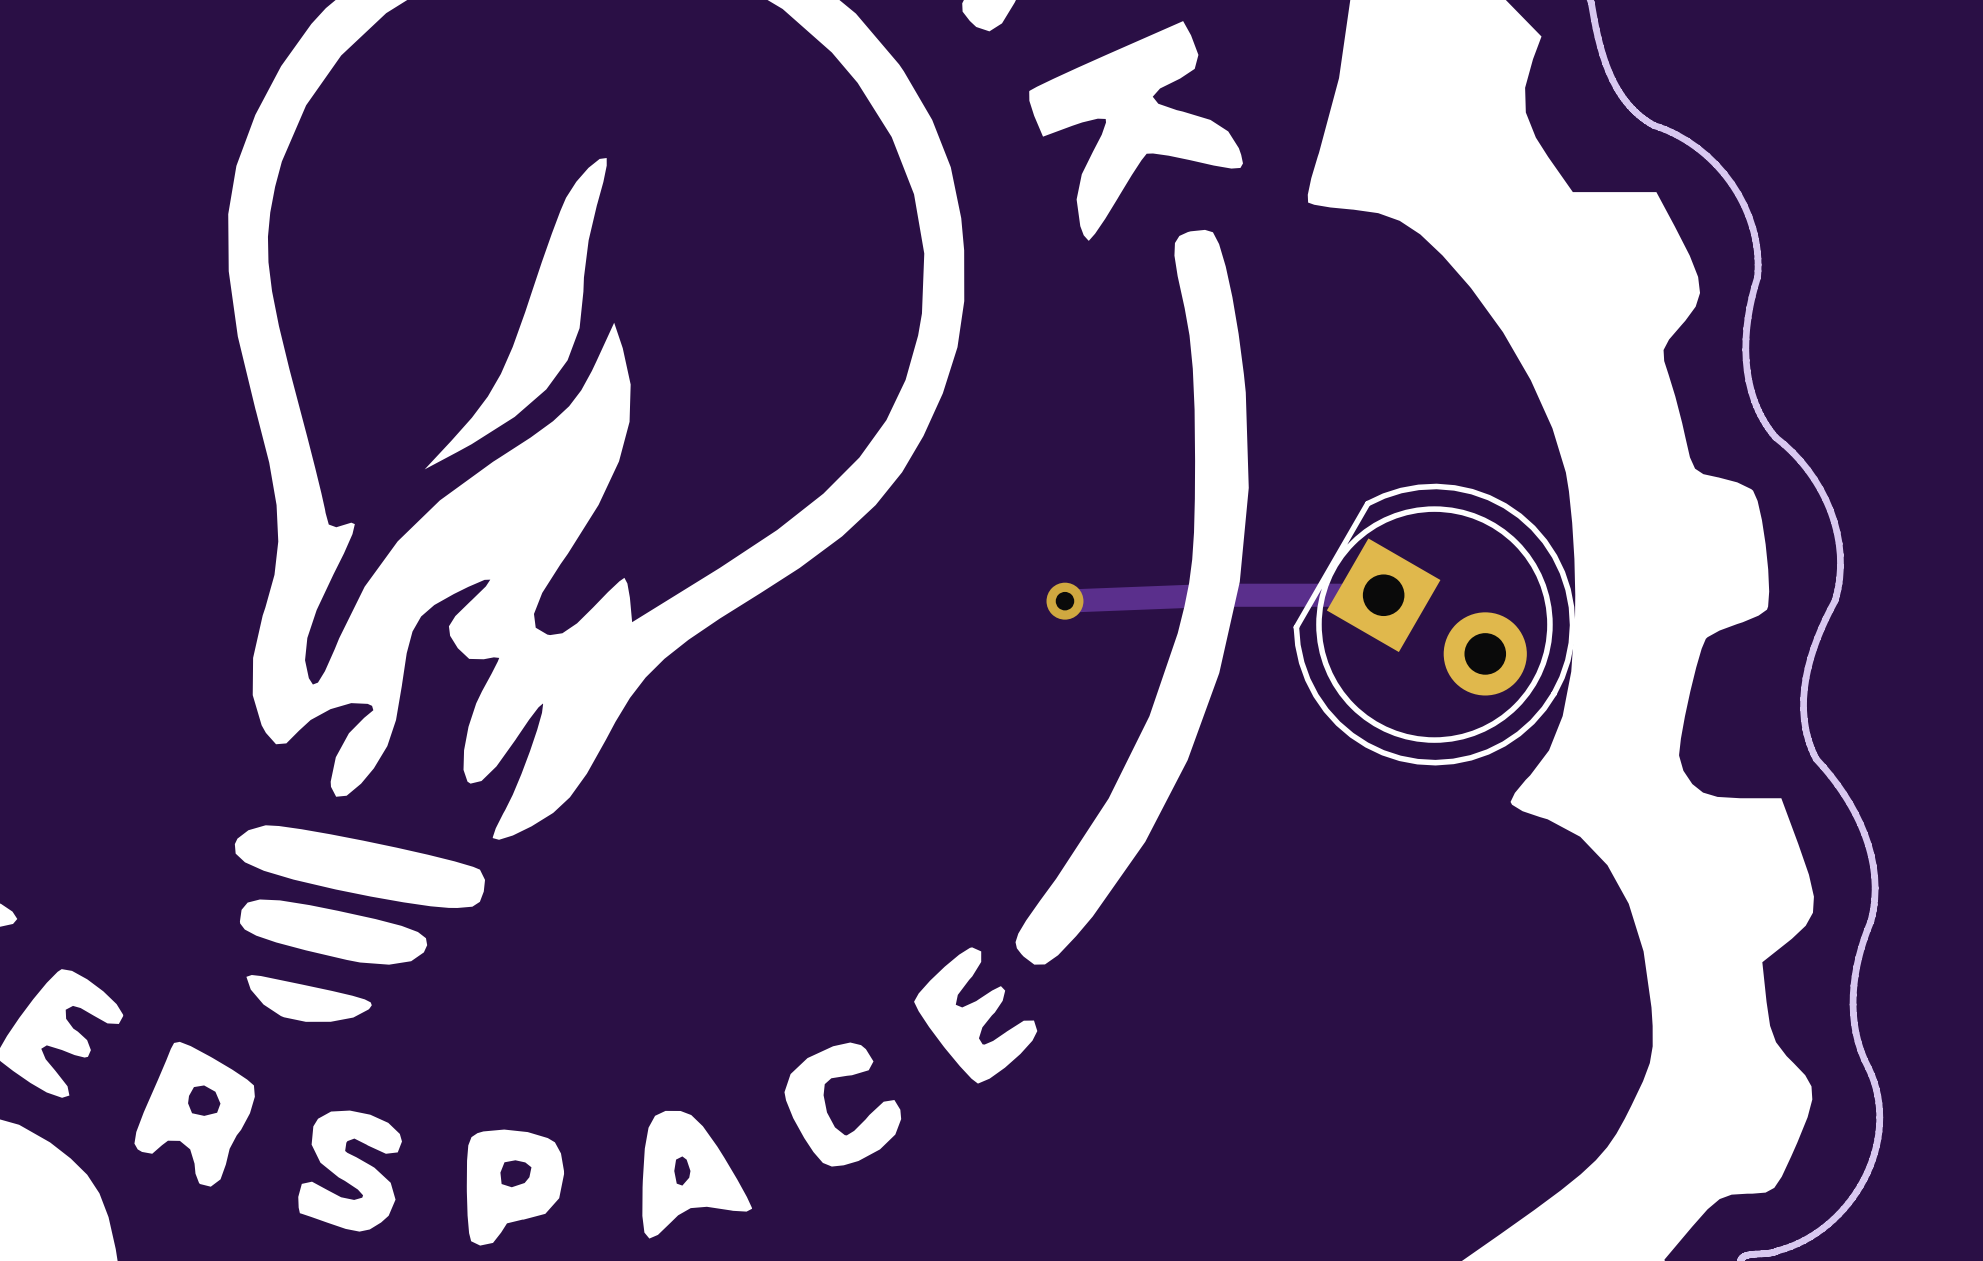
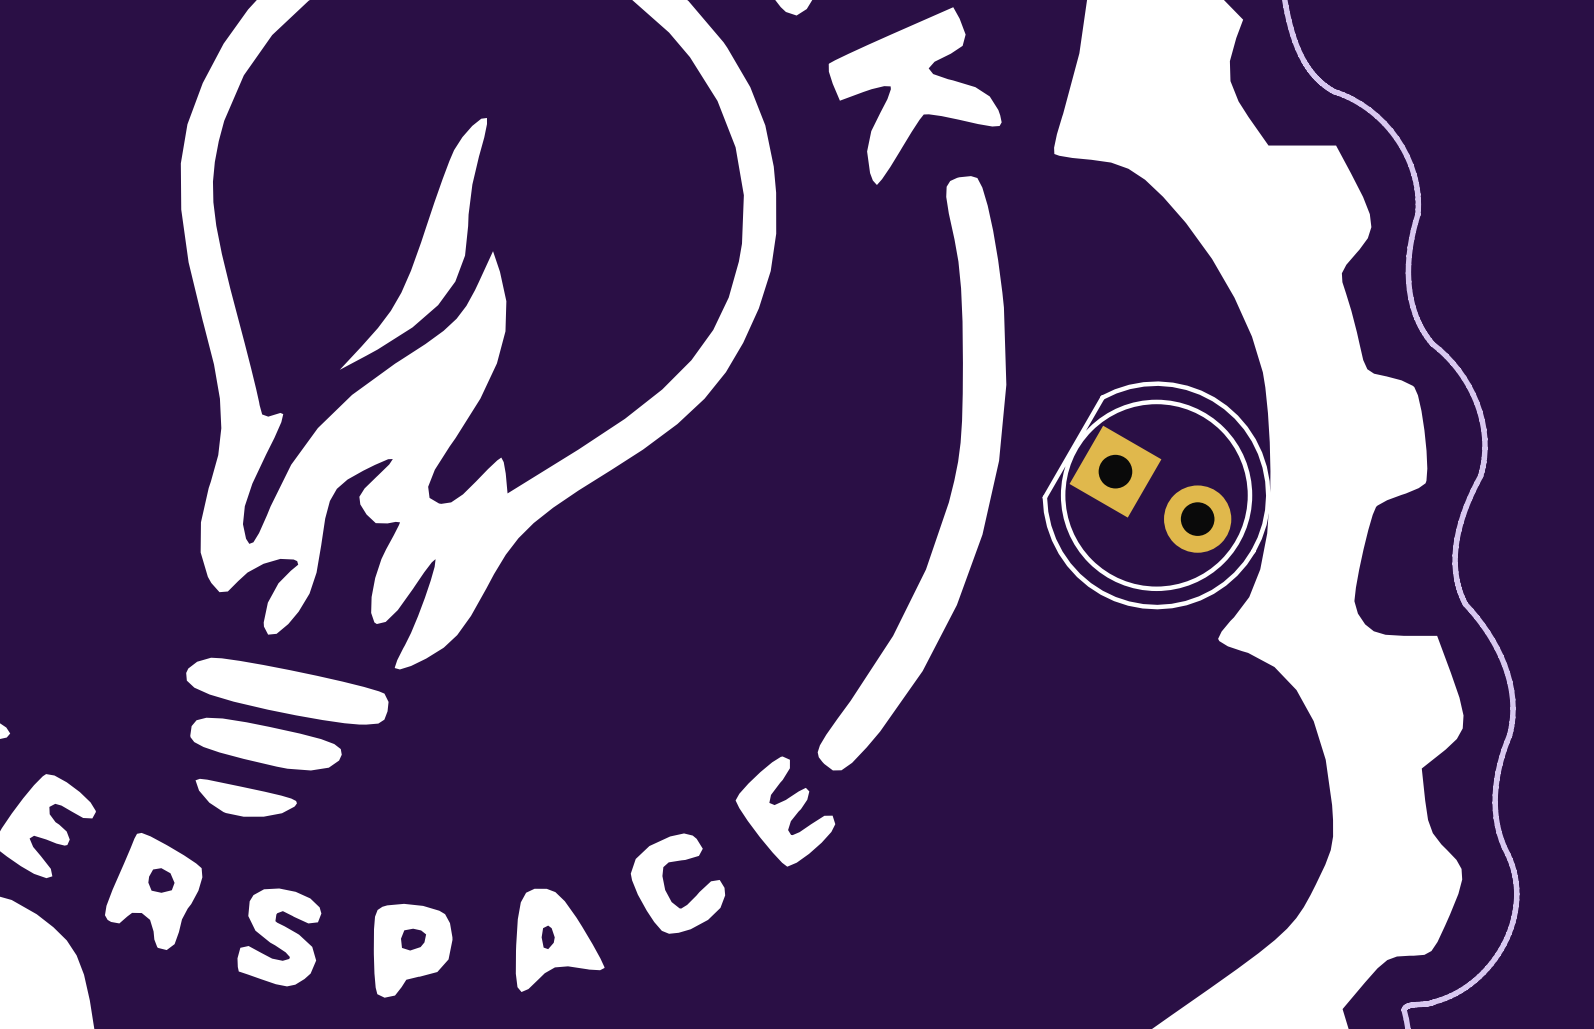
track: (1383, 595) (1217, 595) (1064, 601) -> none
via: (1064, 601) -> none

